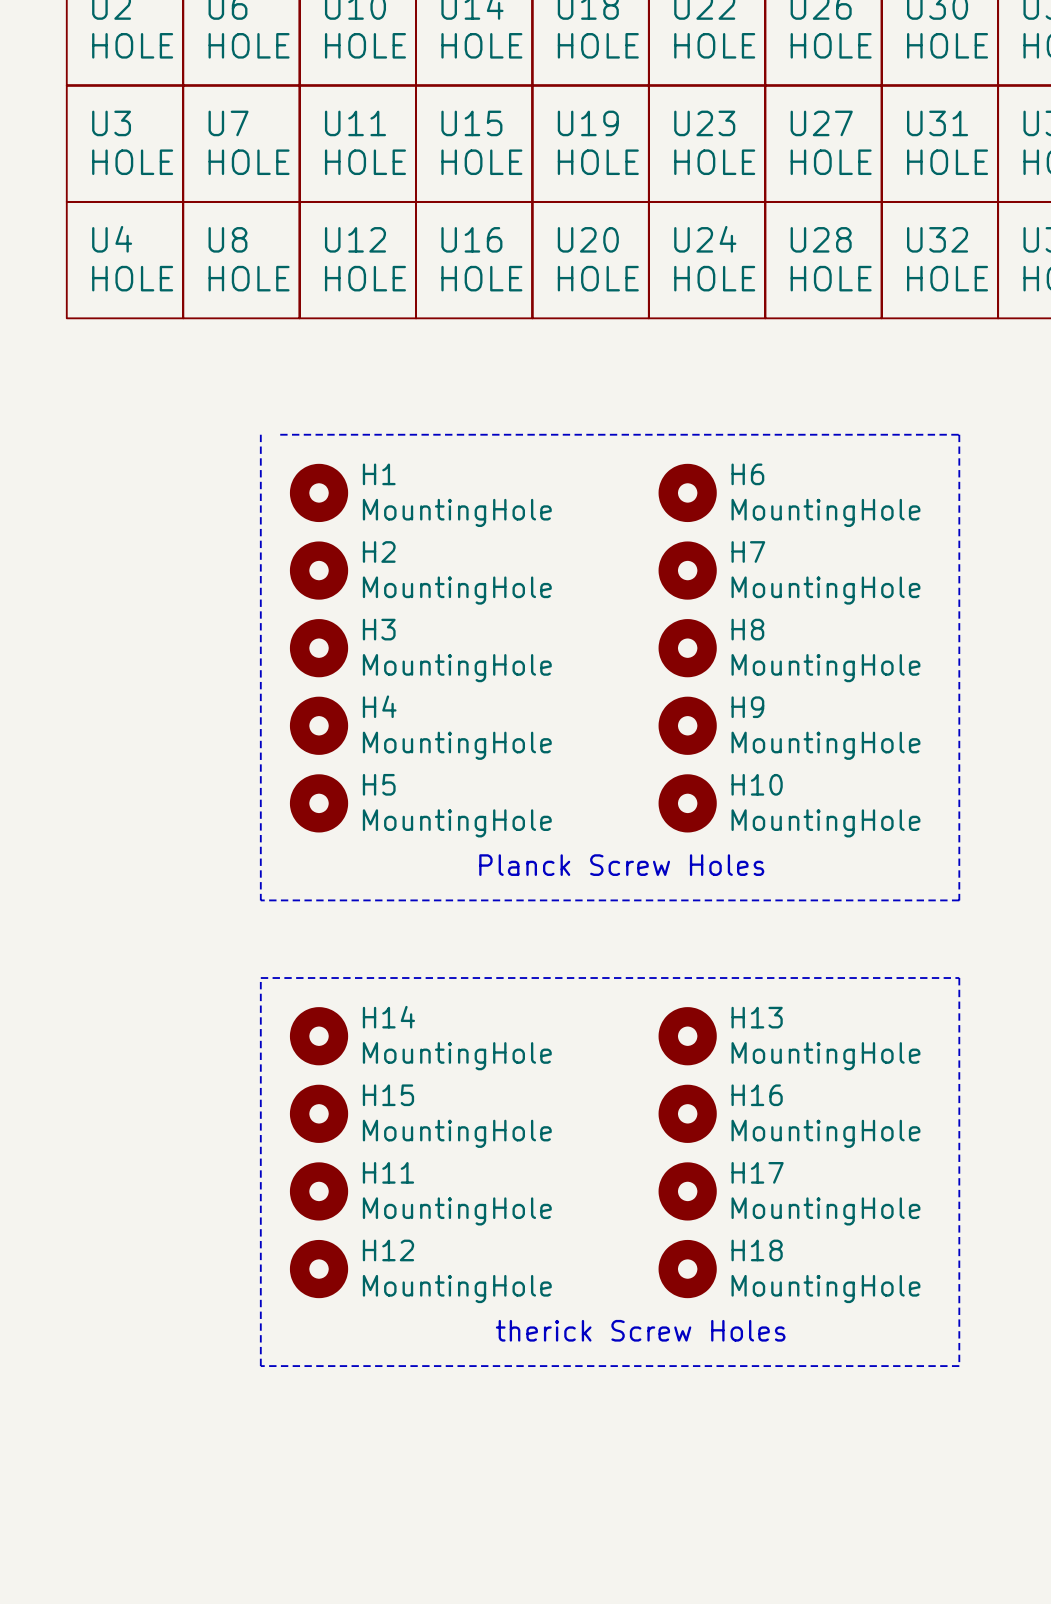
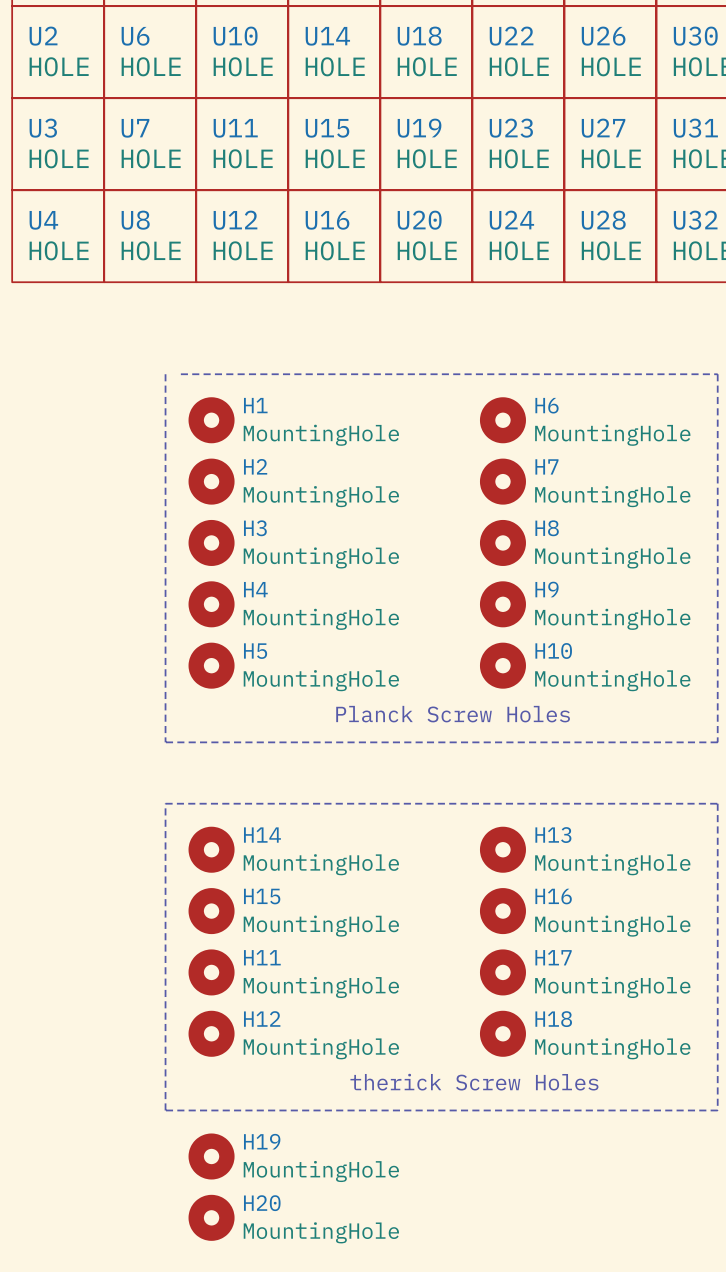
H19: none -> MountingHole (211, 1156)
H20: none -> MountingHole (211, 1217)

